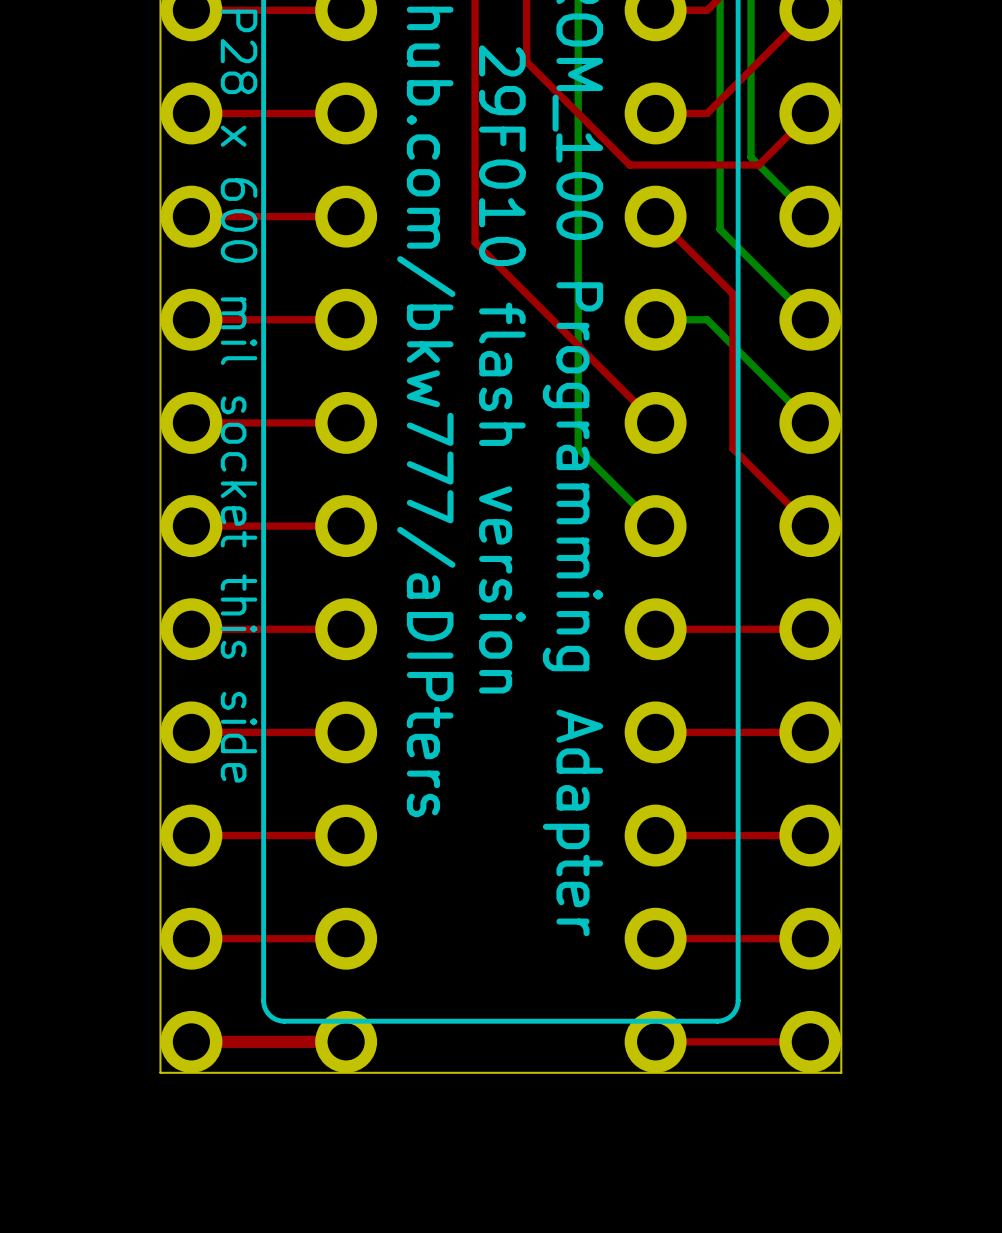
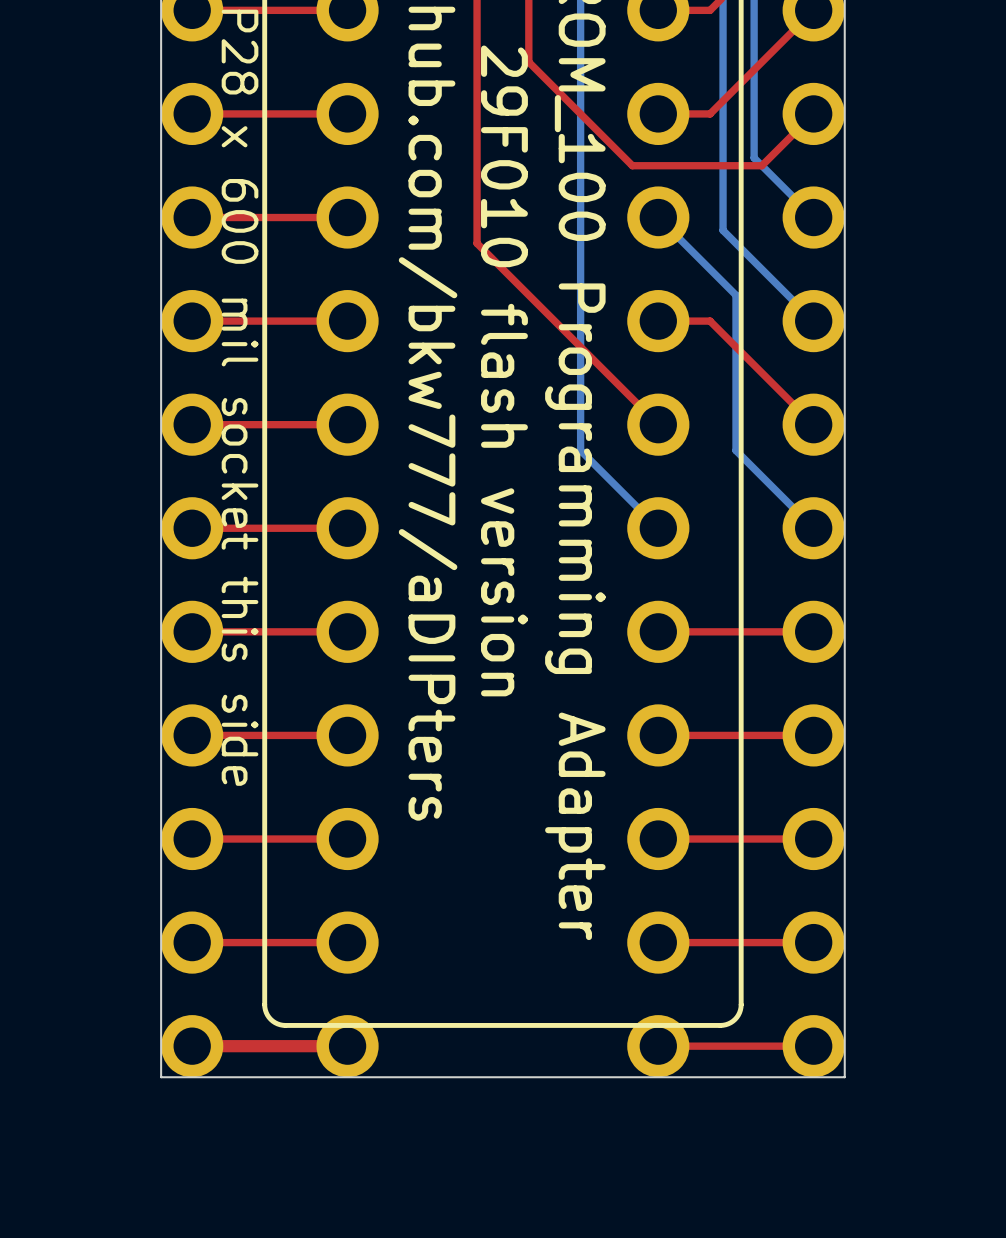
top track: (655, 216) (732, 293) (732, 448) (810, 526) -> none
bottom track: none -> (658, 217) (735, 295) (735, 450) (813, 528)
top track: none -> (658, 321) (710, 321) (813, 424)
bottom track: (655, 319) (707, 319) (810, 422) -> none

